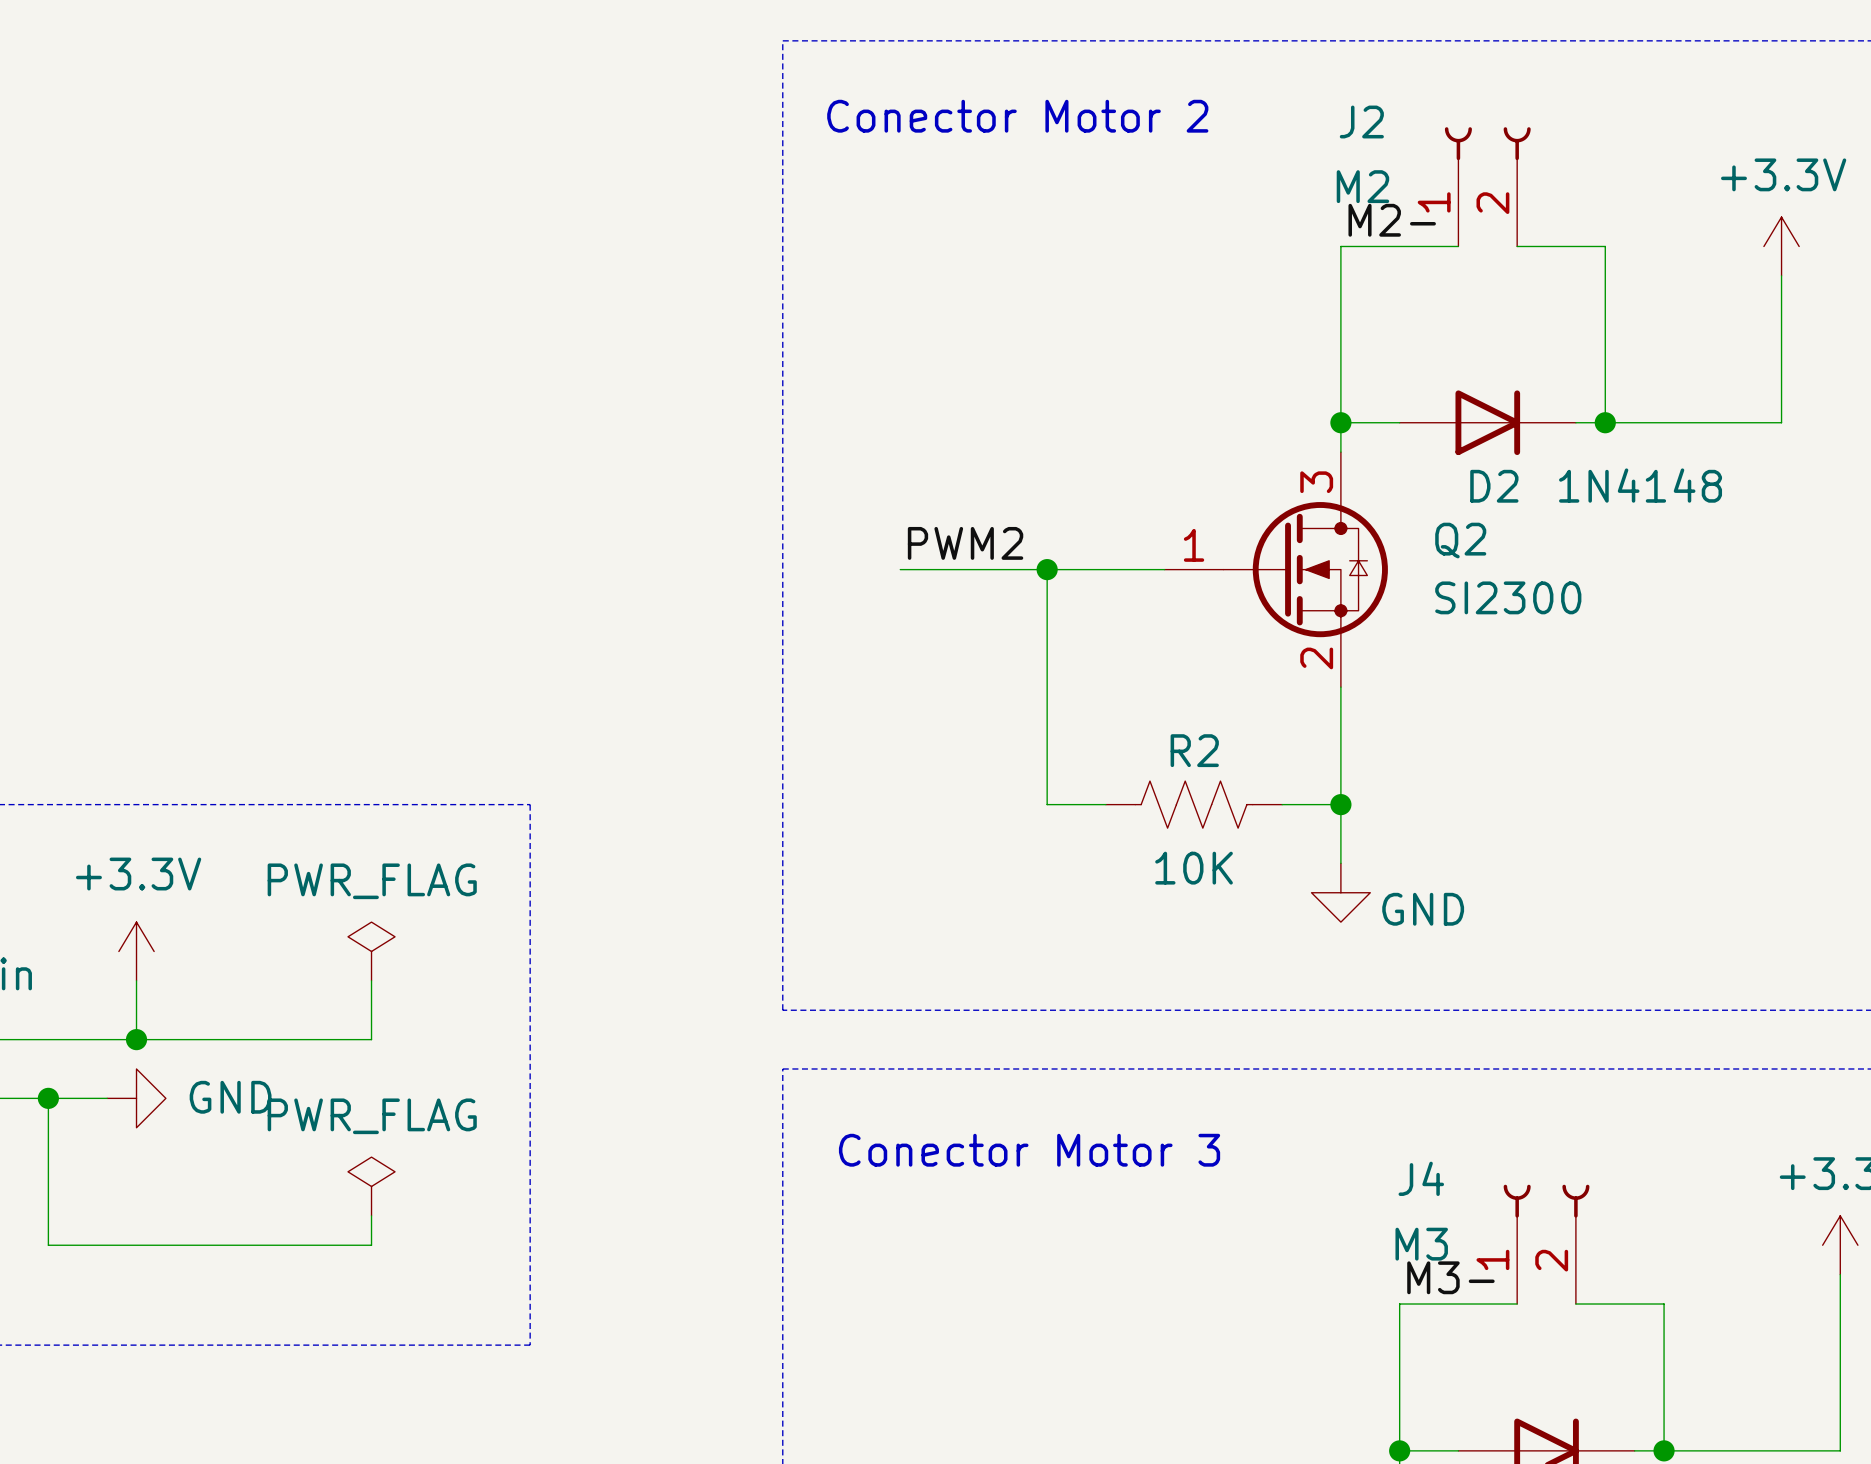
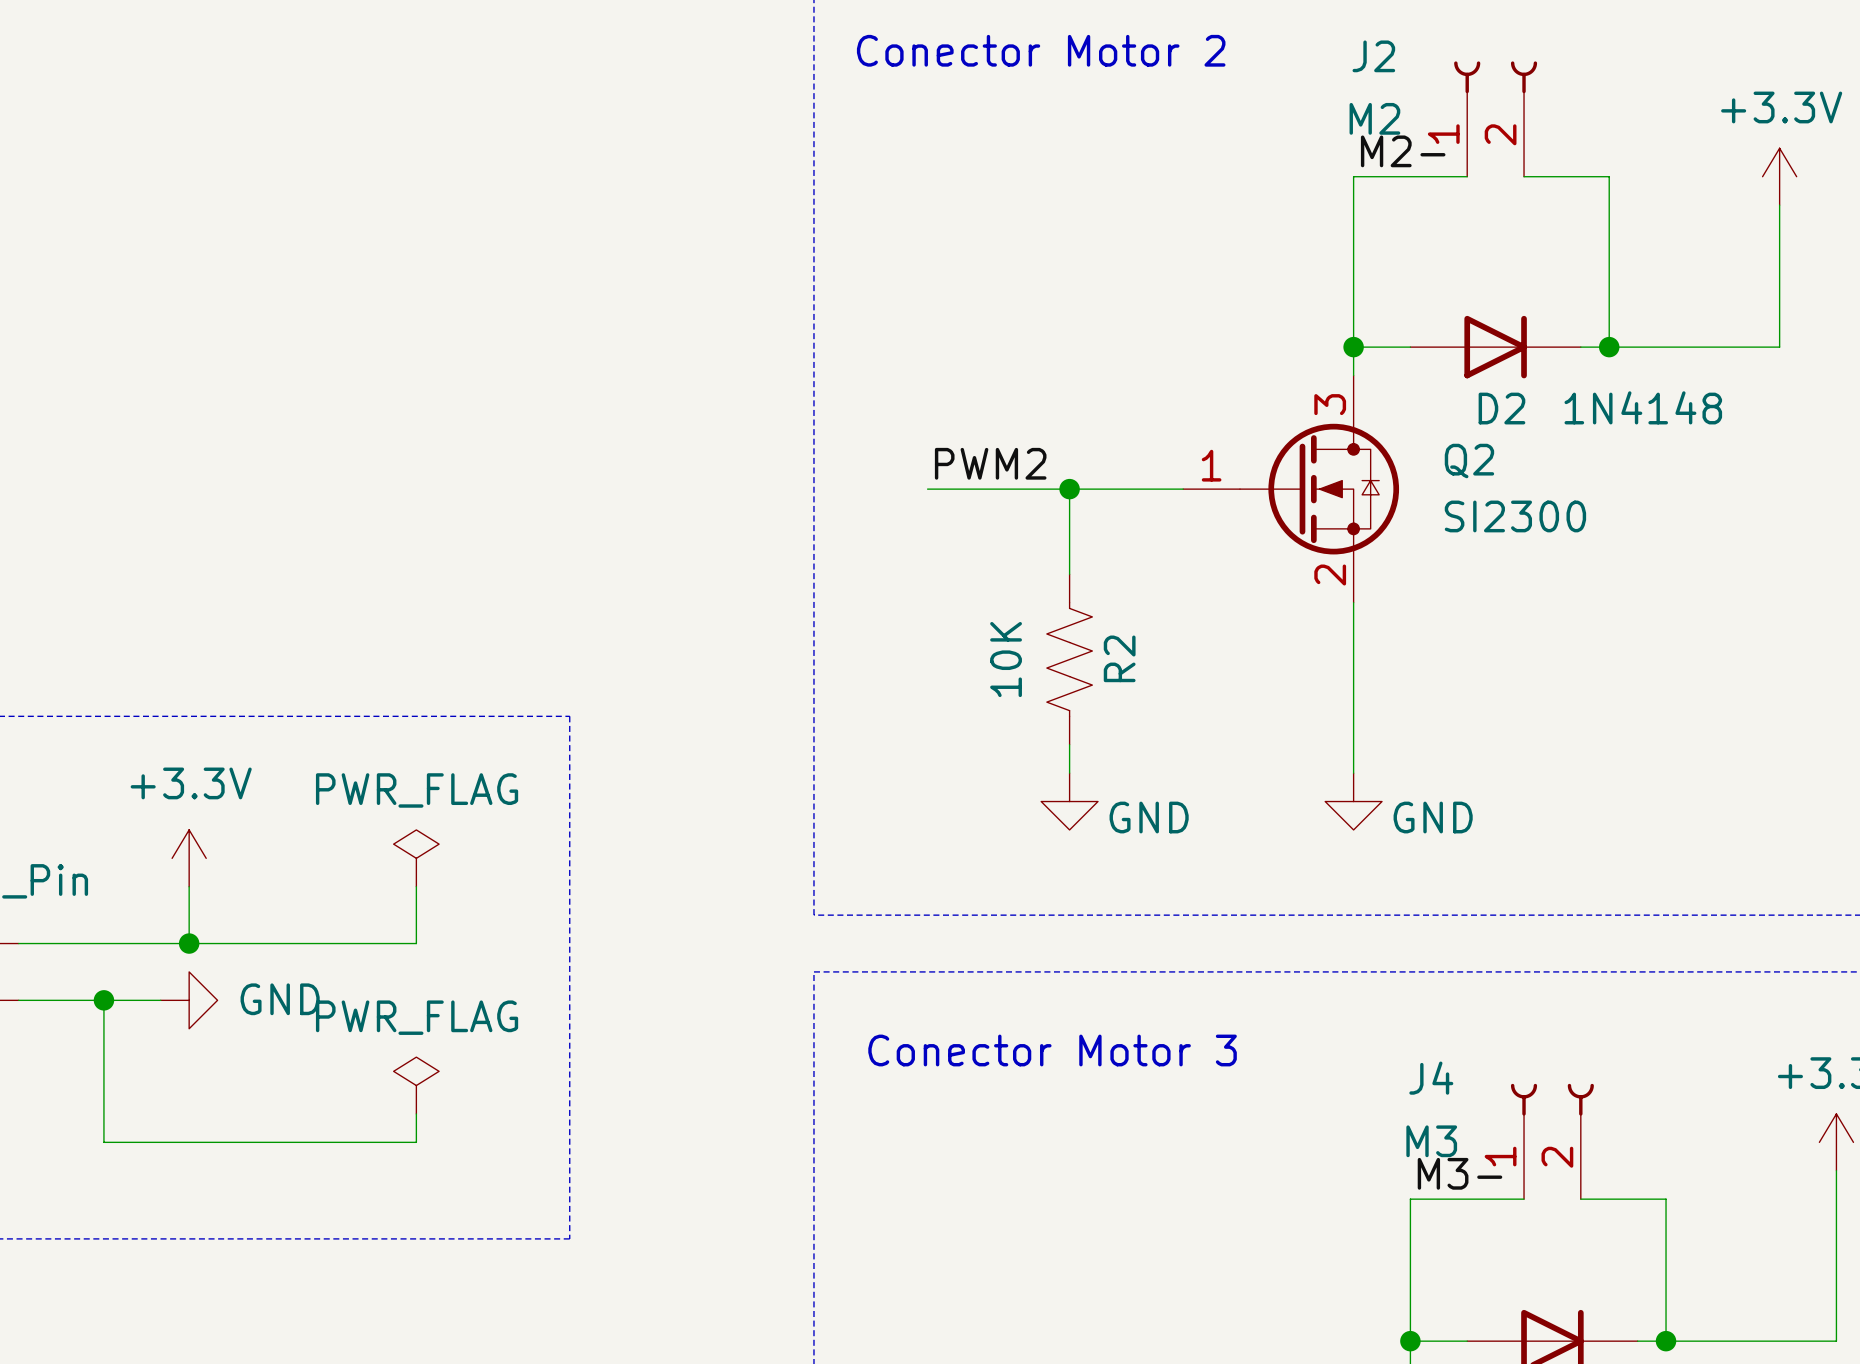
wire: (1047, 657) (1047, 804) (1105, 804) -> none
R2 rotation: 0° (1194, 804) -> 90° clockwise (1069, 659)
R2 position: (1194, 804) -> (1069, 659)
wire: (1282, 804) (1340, 804) -> none
junction: (1340, 804) -> none
wire: none -> (1069, 744) (1069, 773)
power symbol: none -> GND (1069, 801)

